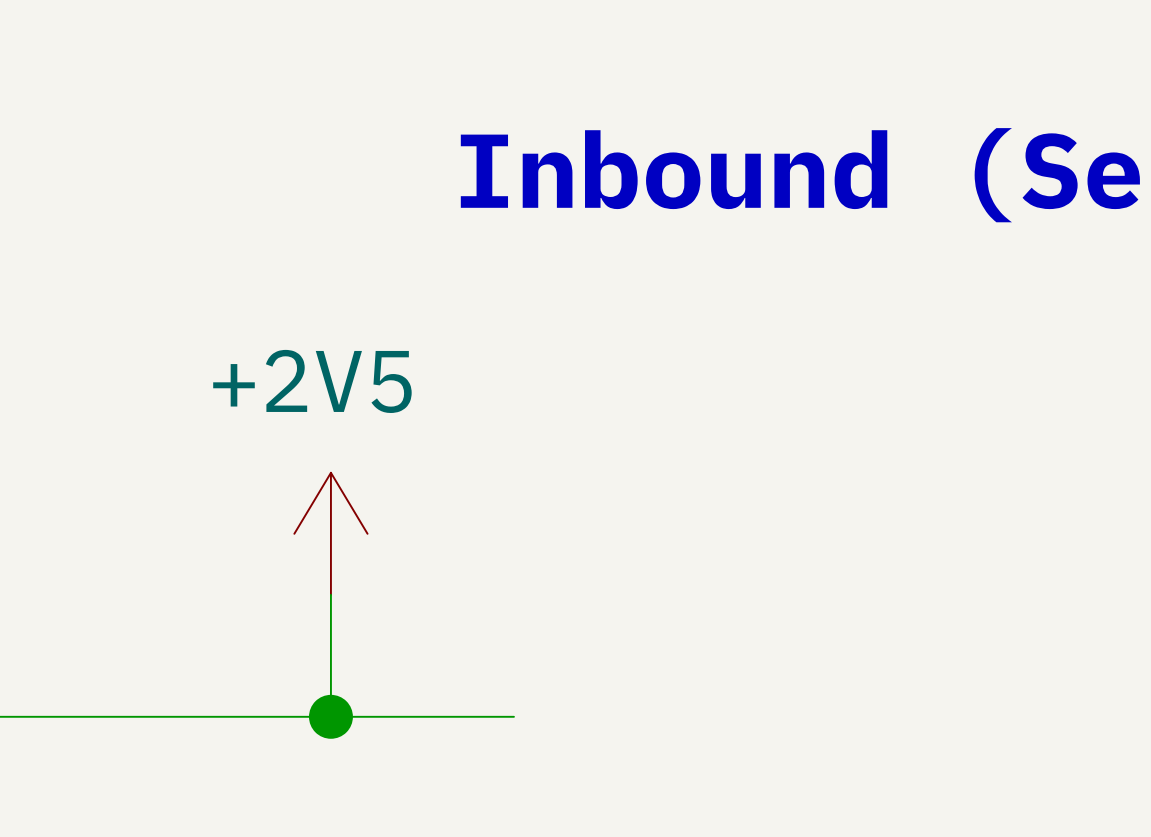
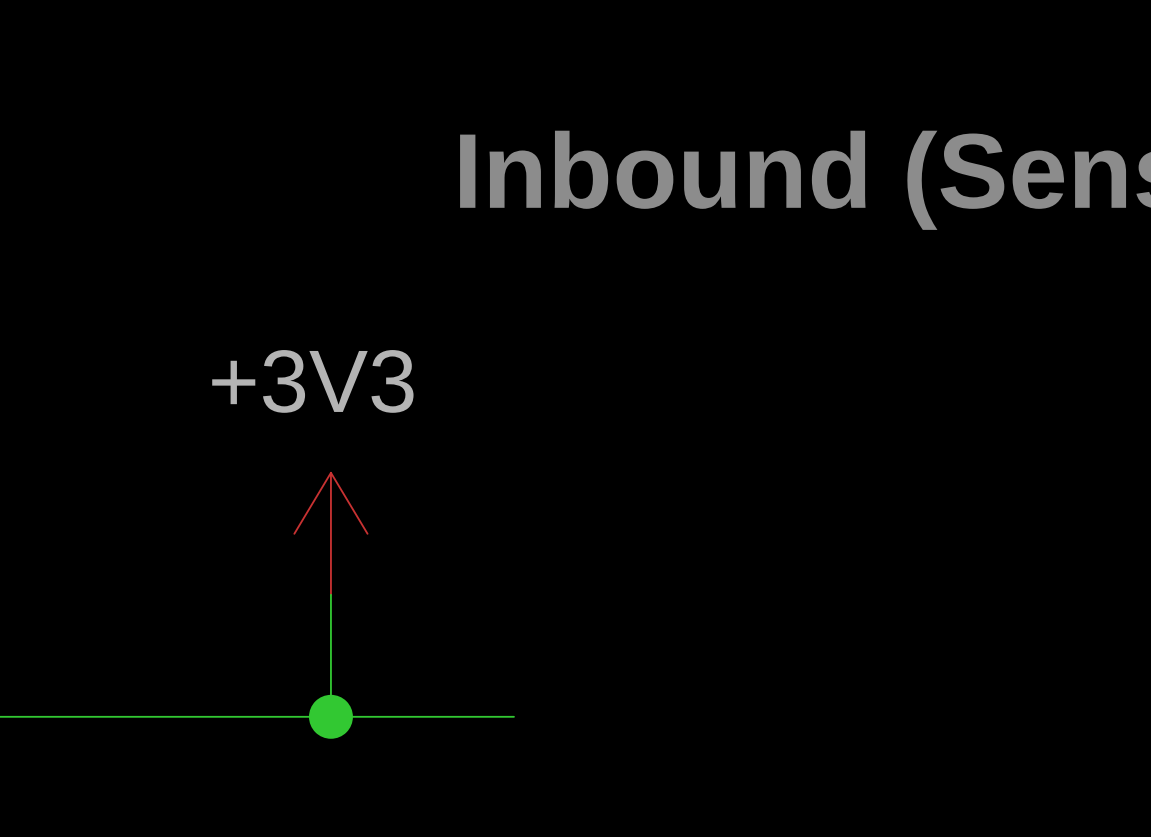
power symbol: +2V5 (330, 533) -> +3V3 (330, 533)

